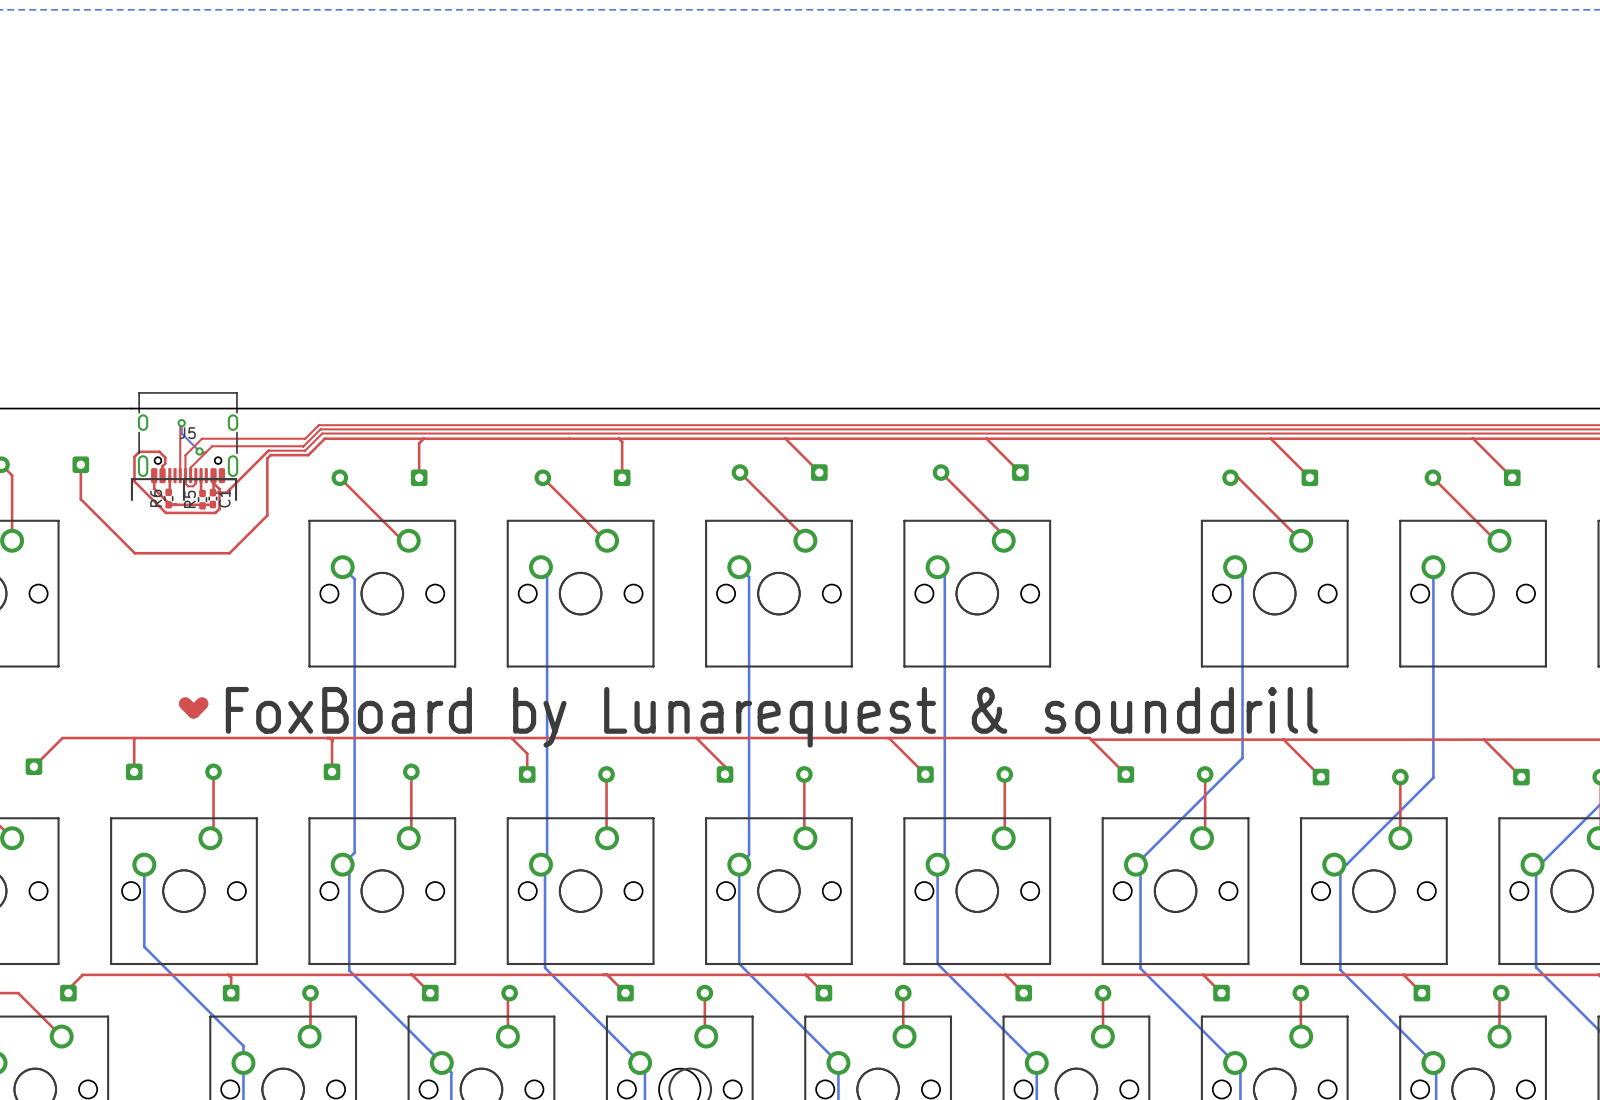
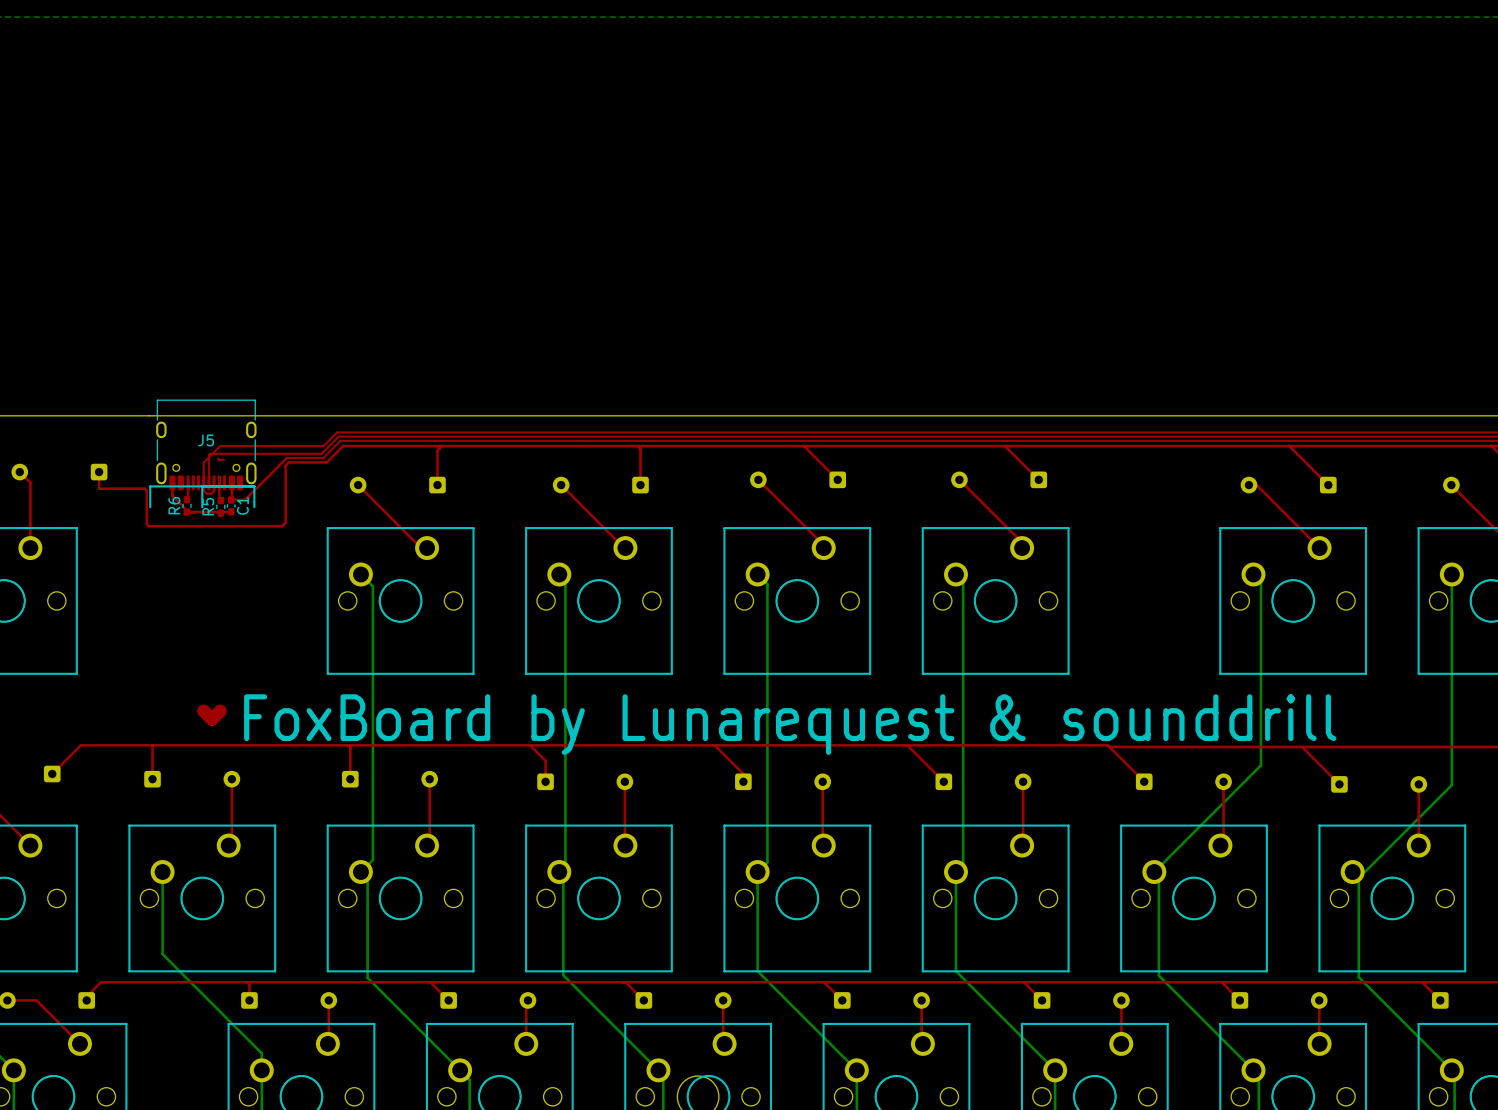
top track: (181, 423) (180, 475) -> none
bottom track: (181, 423) (181, 433) (199, 451) -> none
via: (181, 423) -> none
top track: (303, 446) (212, 446) (190, 467) -> (321, 453) (210, 453) (208, 475)
via: (199, 451) -> none
top track: (162, 475) (165, 457) (159, 451) (139, 451) (134, 456) (134, 481) (165, 512) (215, 512) (219, 508) (219, 489) (213, 483) -> none
top track: (80, 481) (80, 499) (134, 553) (229, 553) (263, 518) -> (99, 488) (144, 488) (146, 490) (146, 524) (148, 526) (282, 526)

